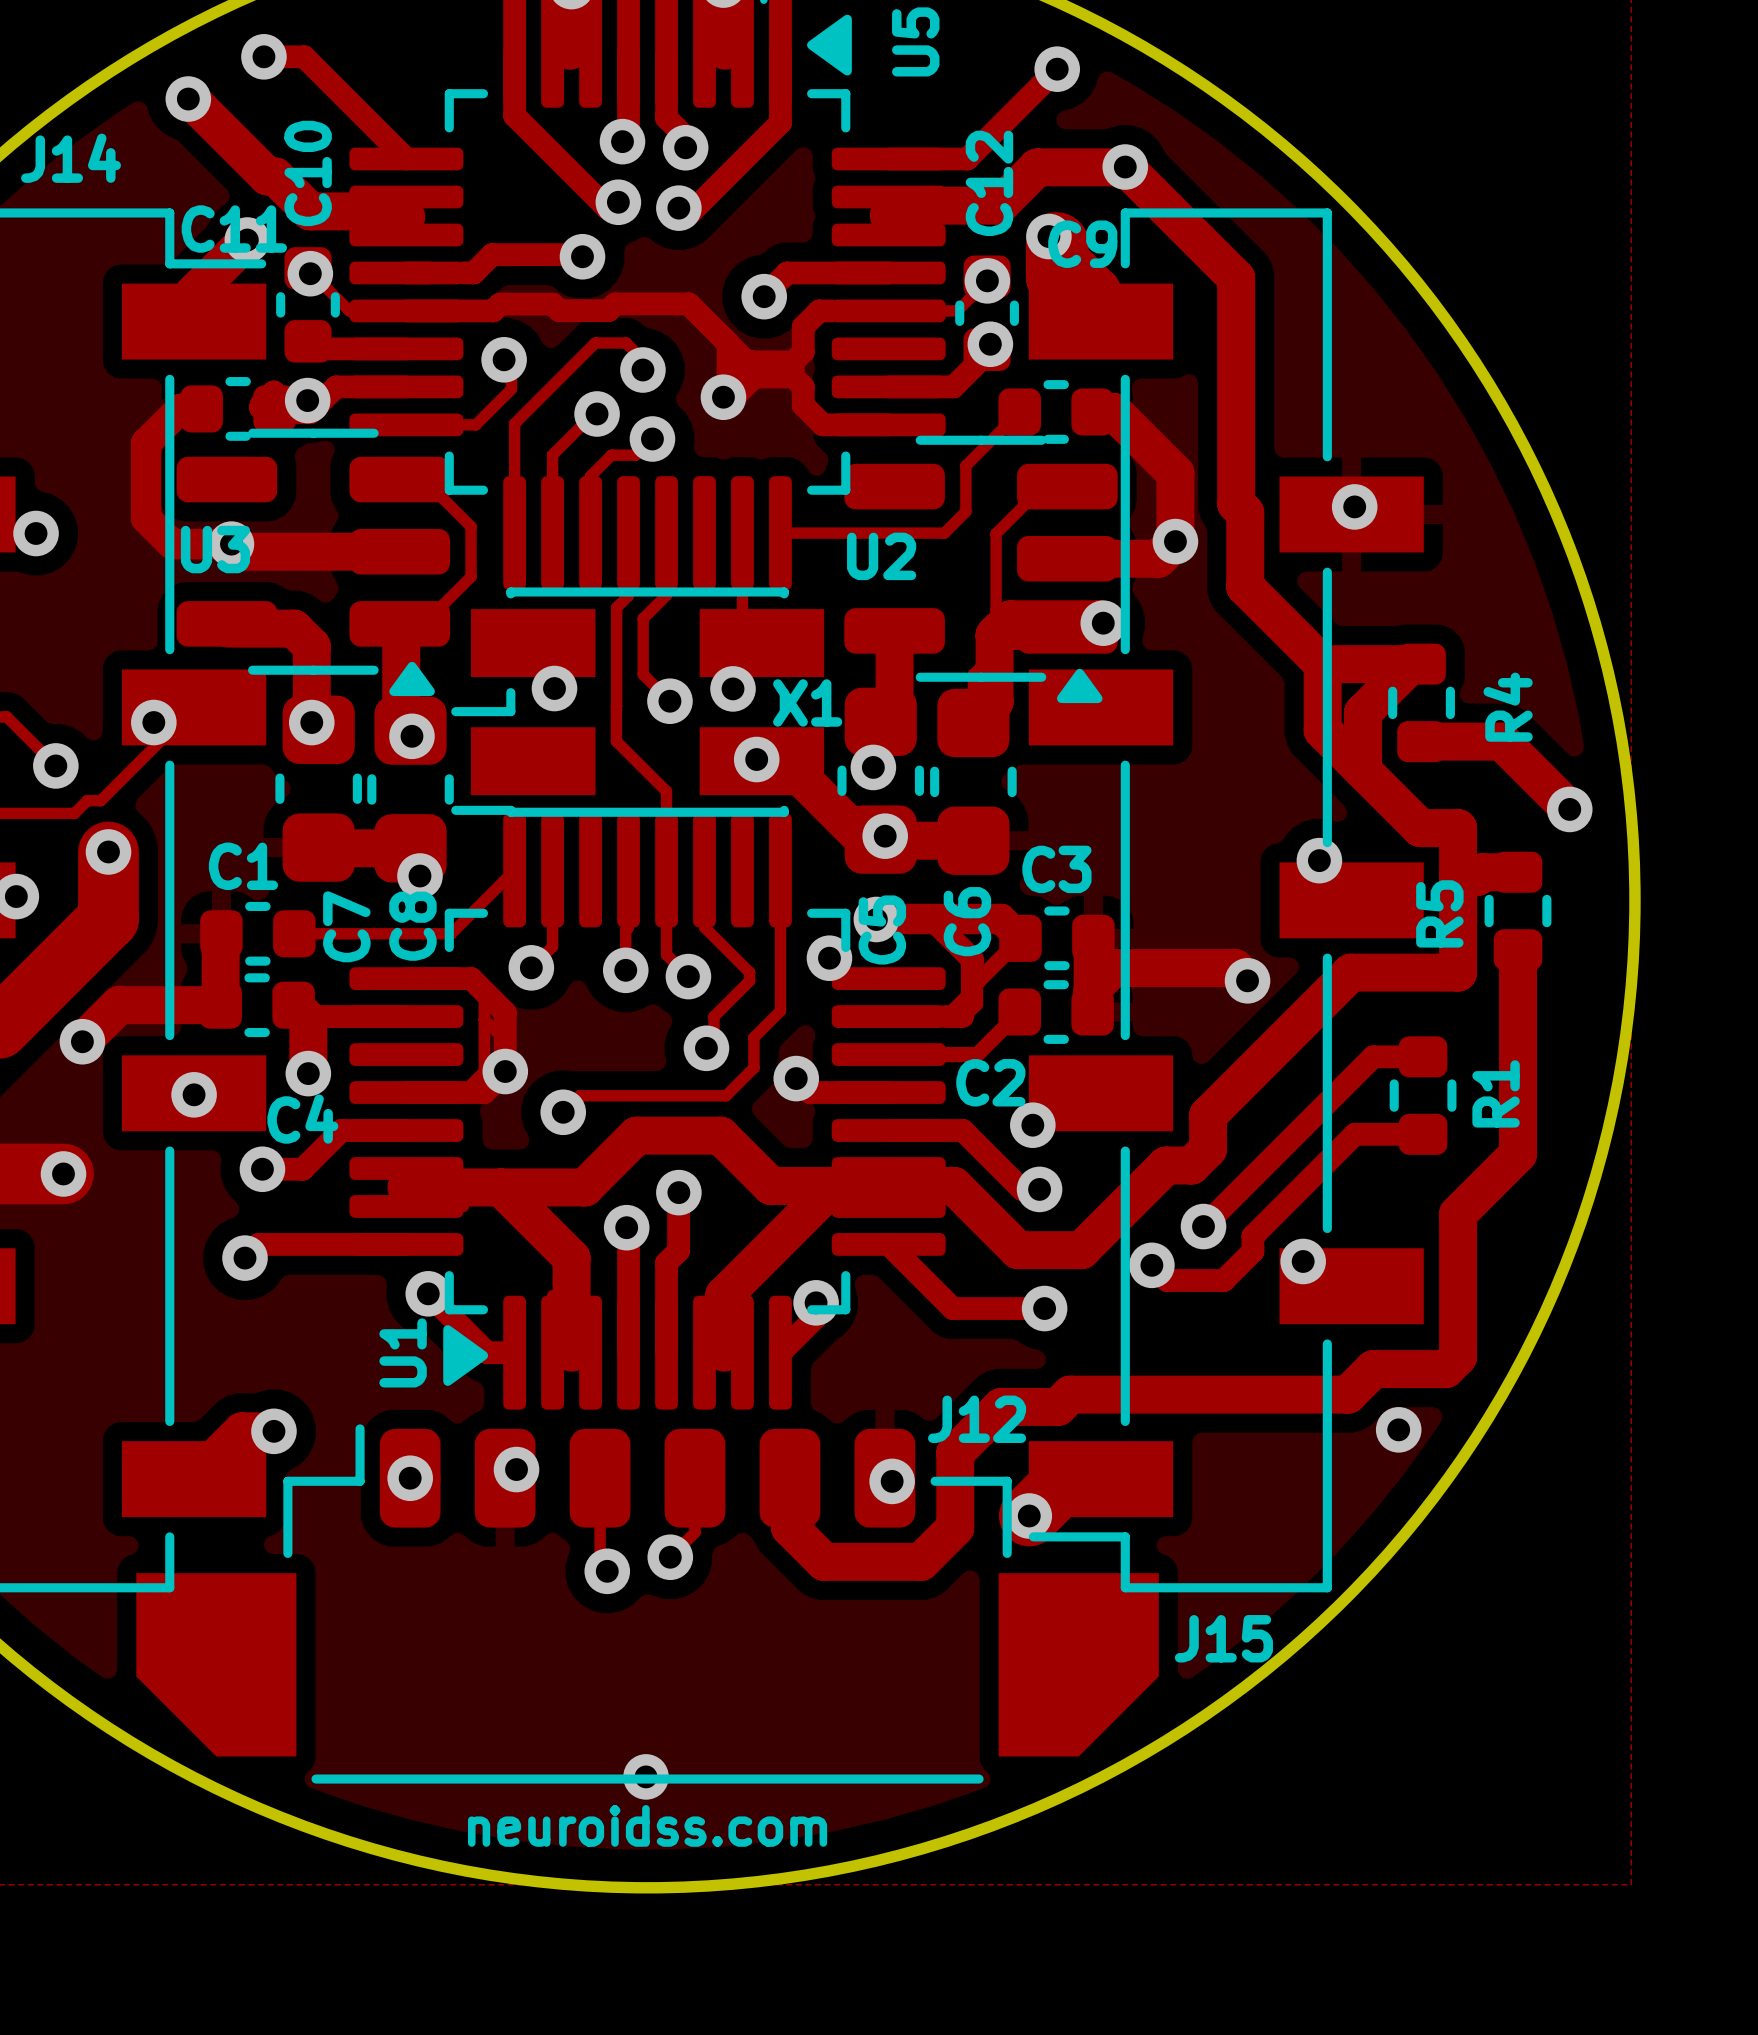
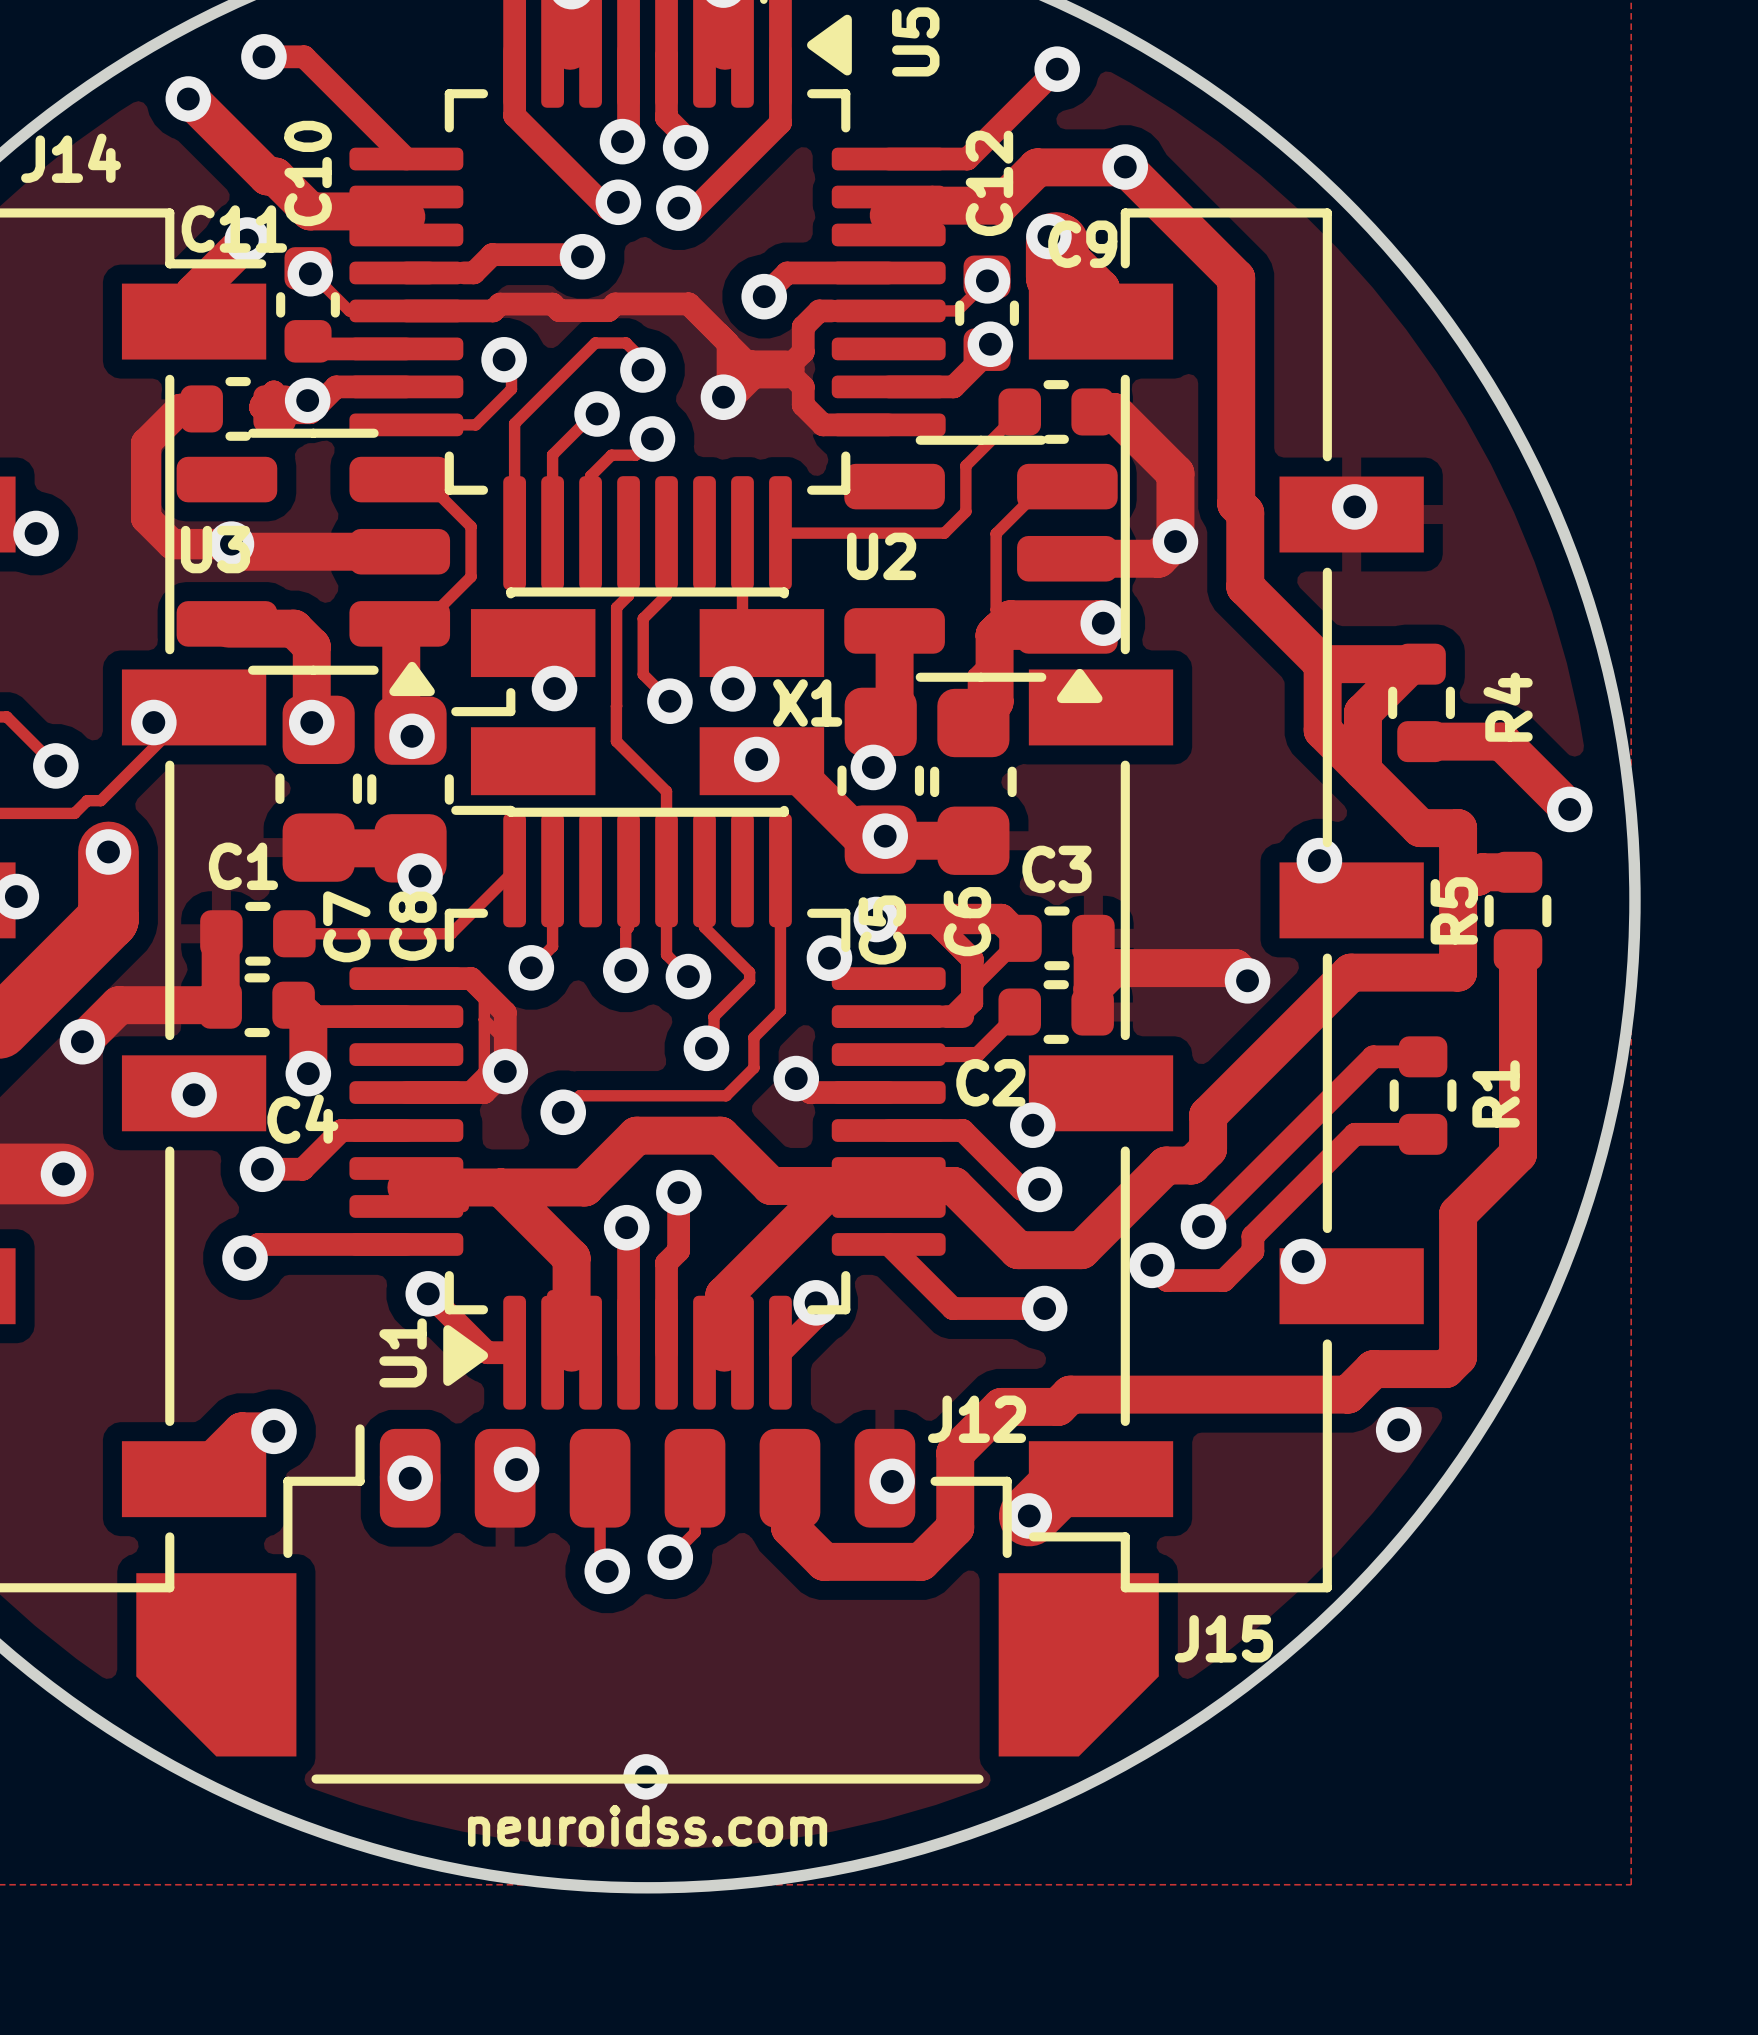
R5 name position: R5 (1439, 913) -> R5 (1454, 910)

